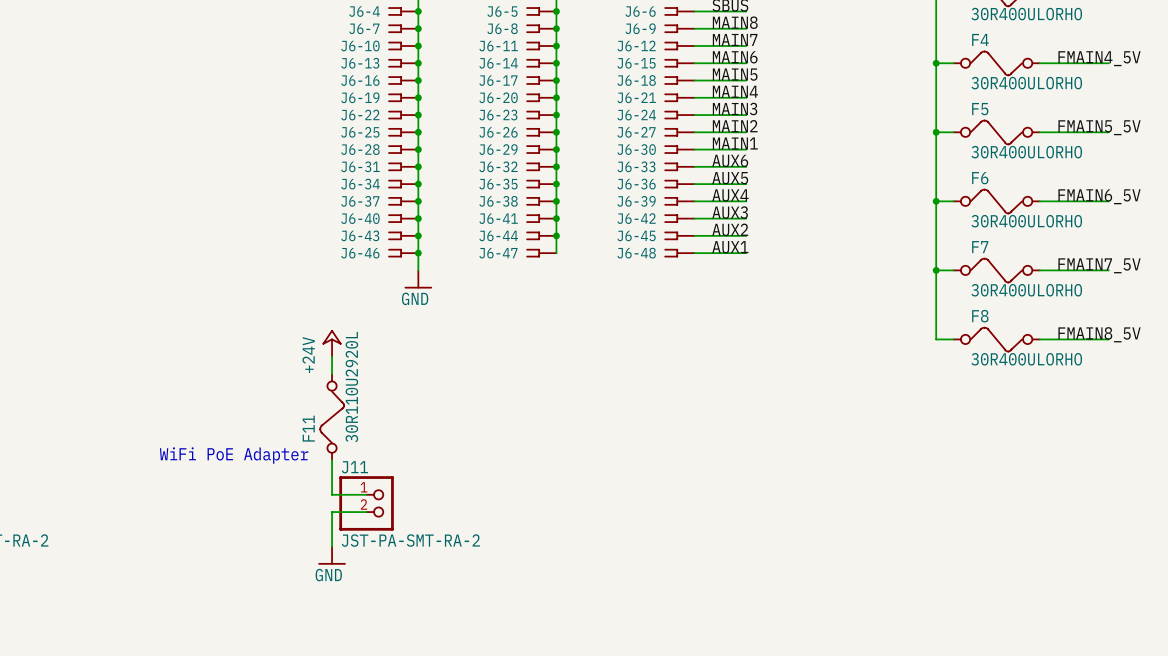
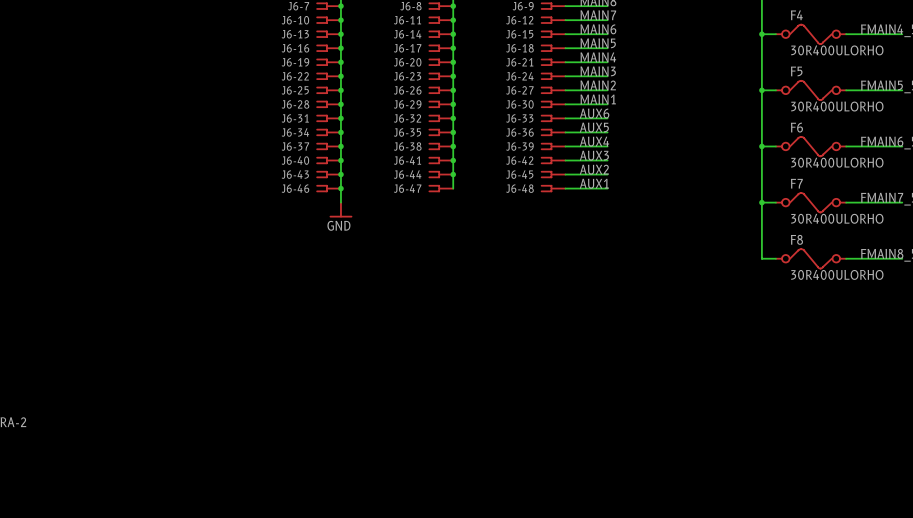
power symbol: +24V (332, 343) -> none
wire: (332, 356) (332, 373) -> none
F11: 30R110U2920L (332, 417) -> none
text: WiFi PoE Adapter (234, 455) -> none
wire: (332, 460) (332, 494) (366, 494) -> none
J11: JST-PA-SMT-RA-2 (366, 503) -> none
wire: (366, 512) (332, 512) (332, 546) -> none
power symbol: GND (332, 555) -> none

